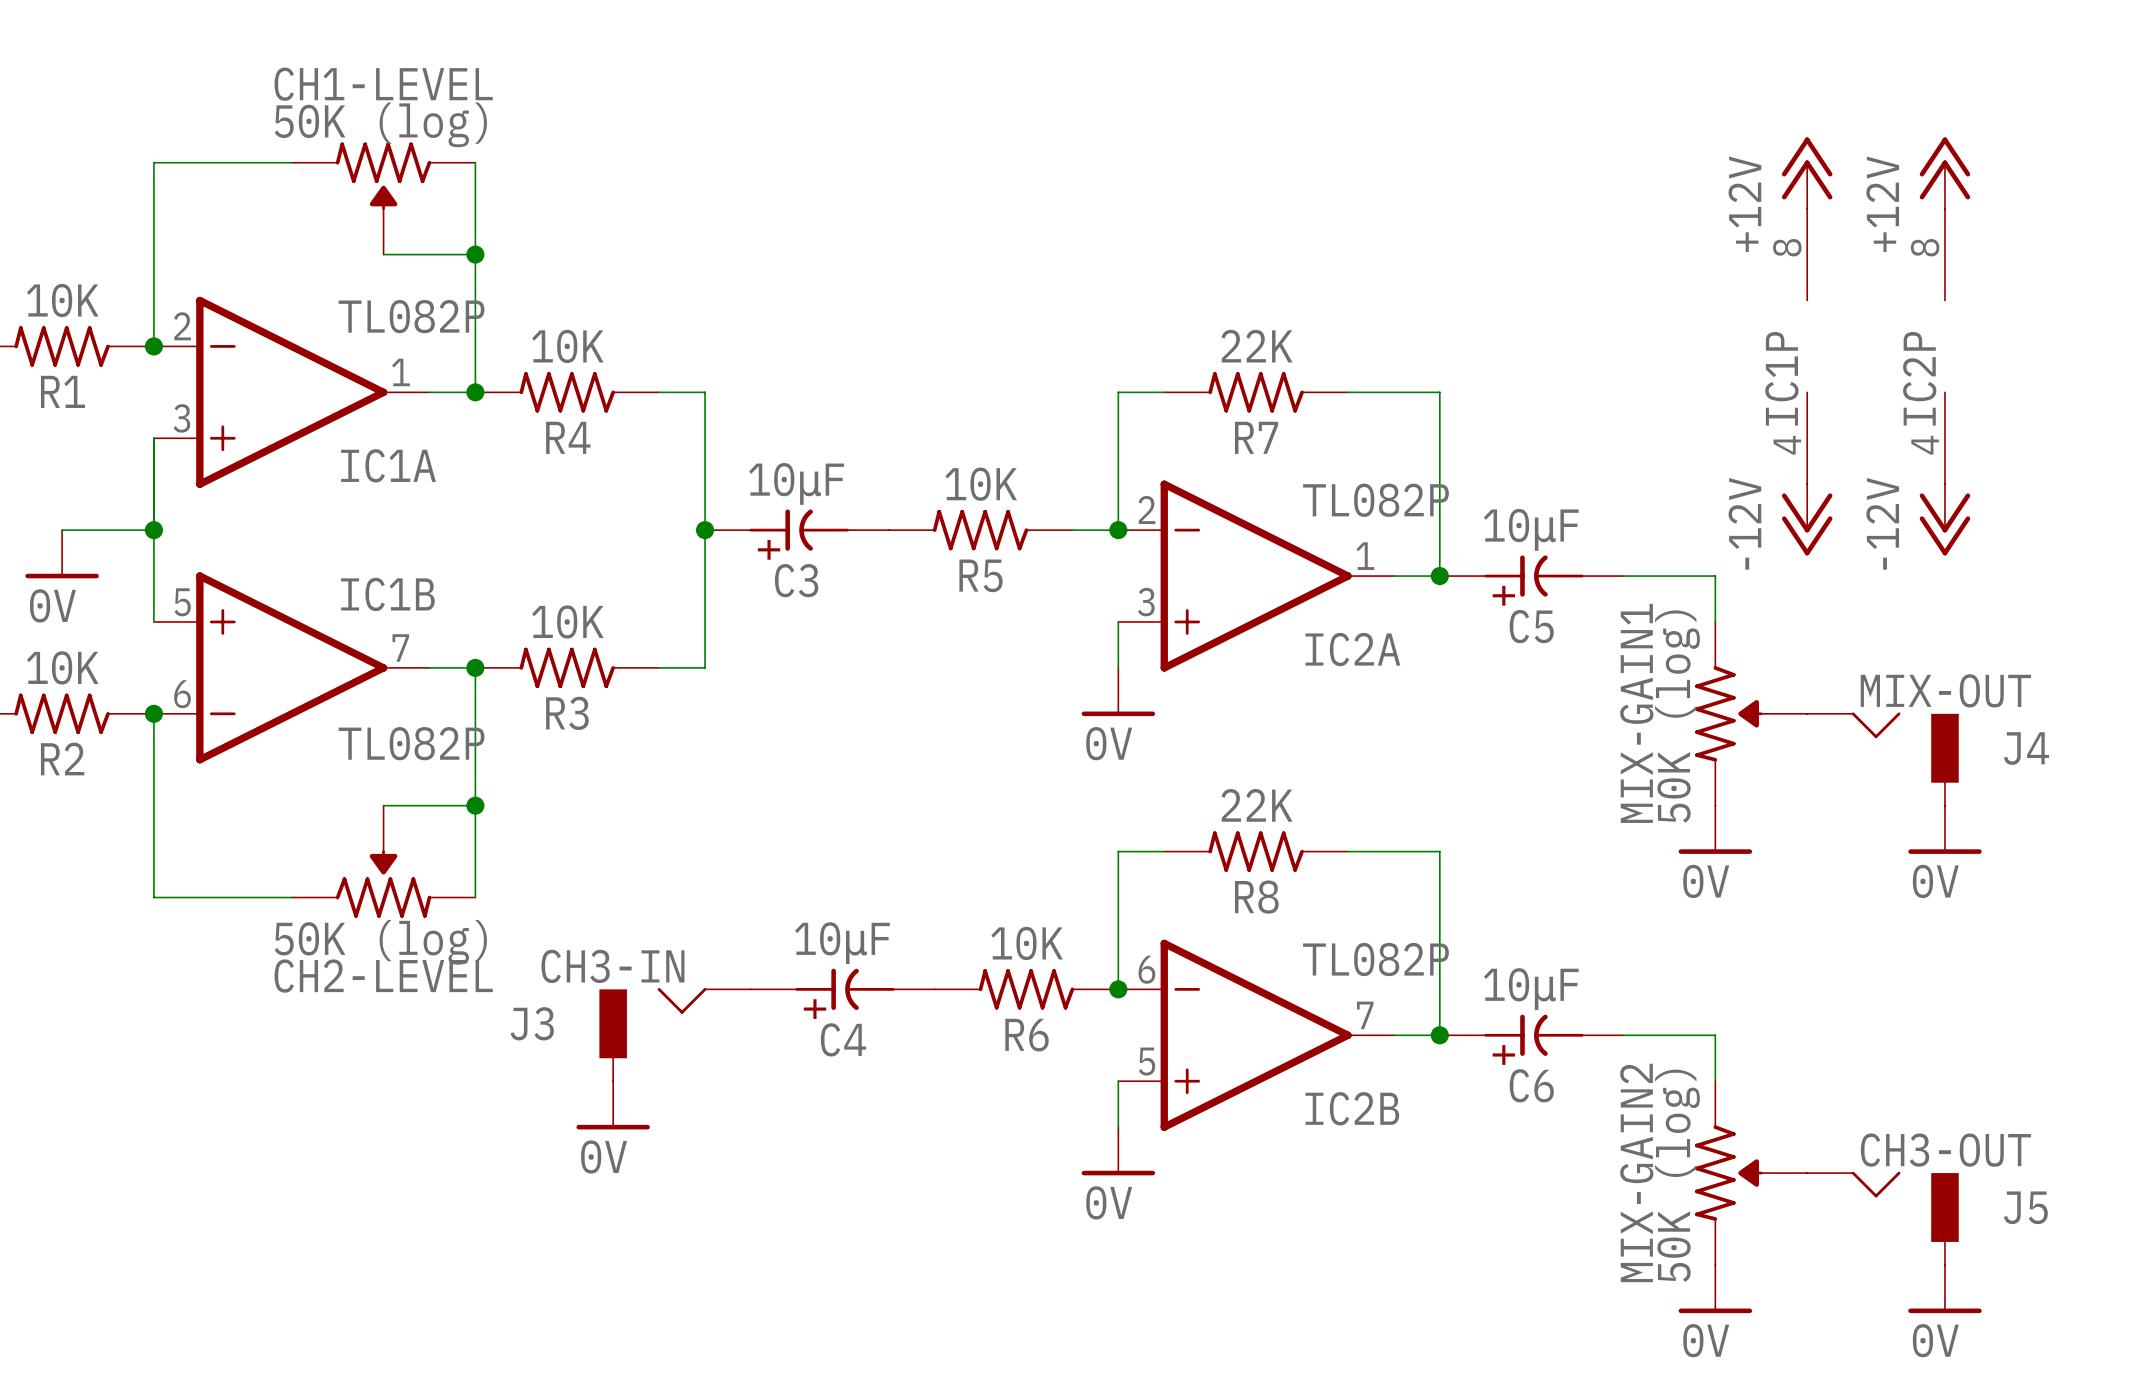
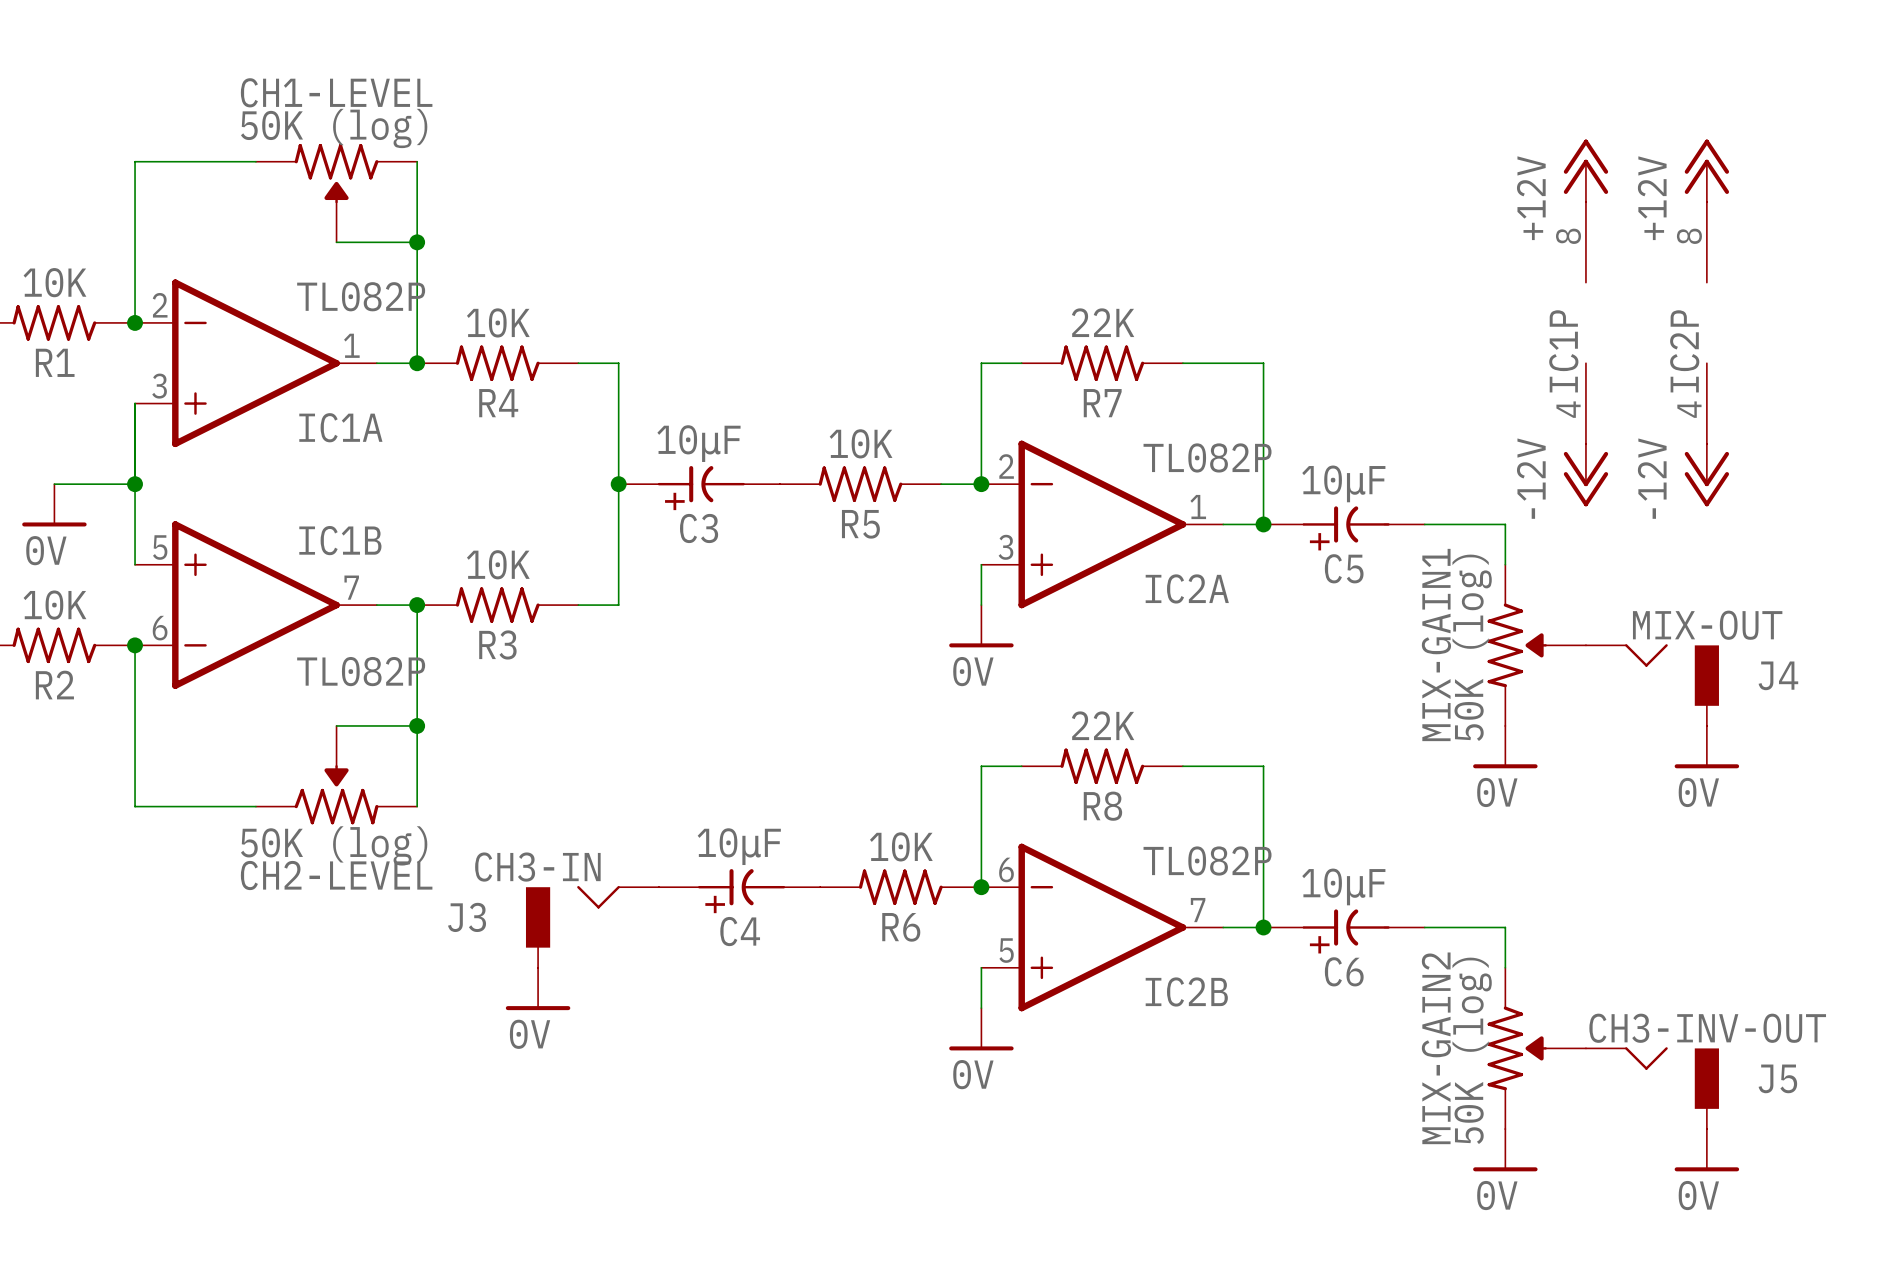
J5 value: CH3-OUT (1945, 1150) -> CH3-INV-OUT (1707, 1028)

